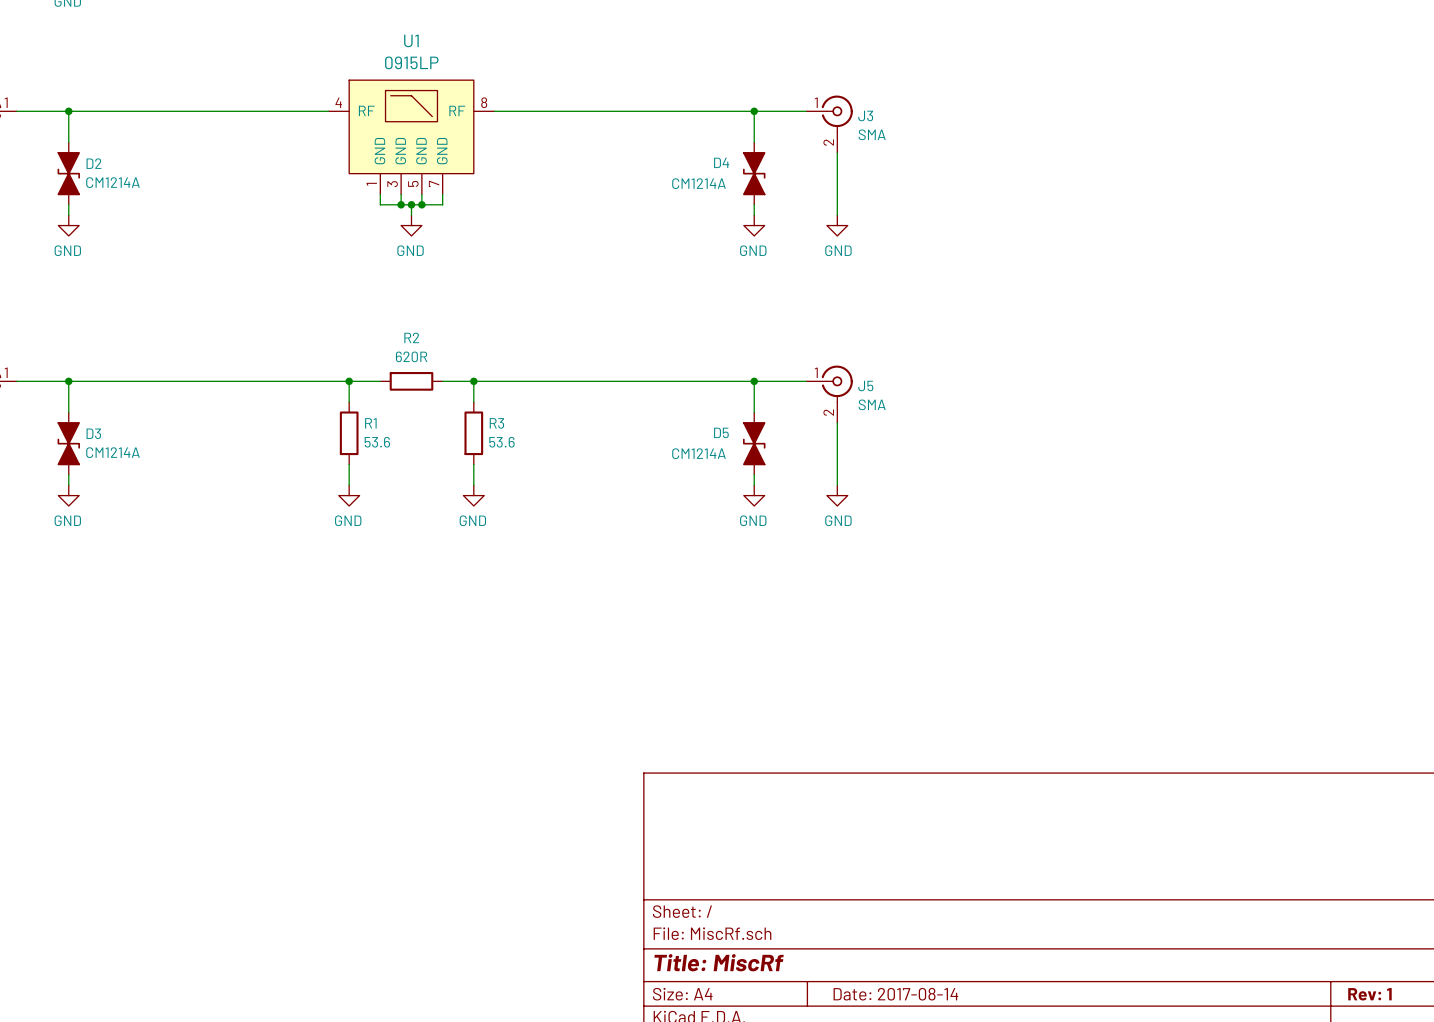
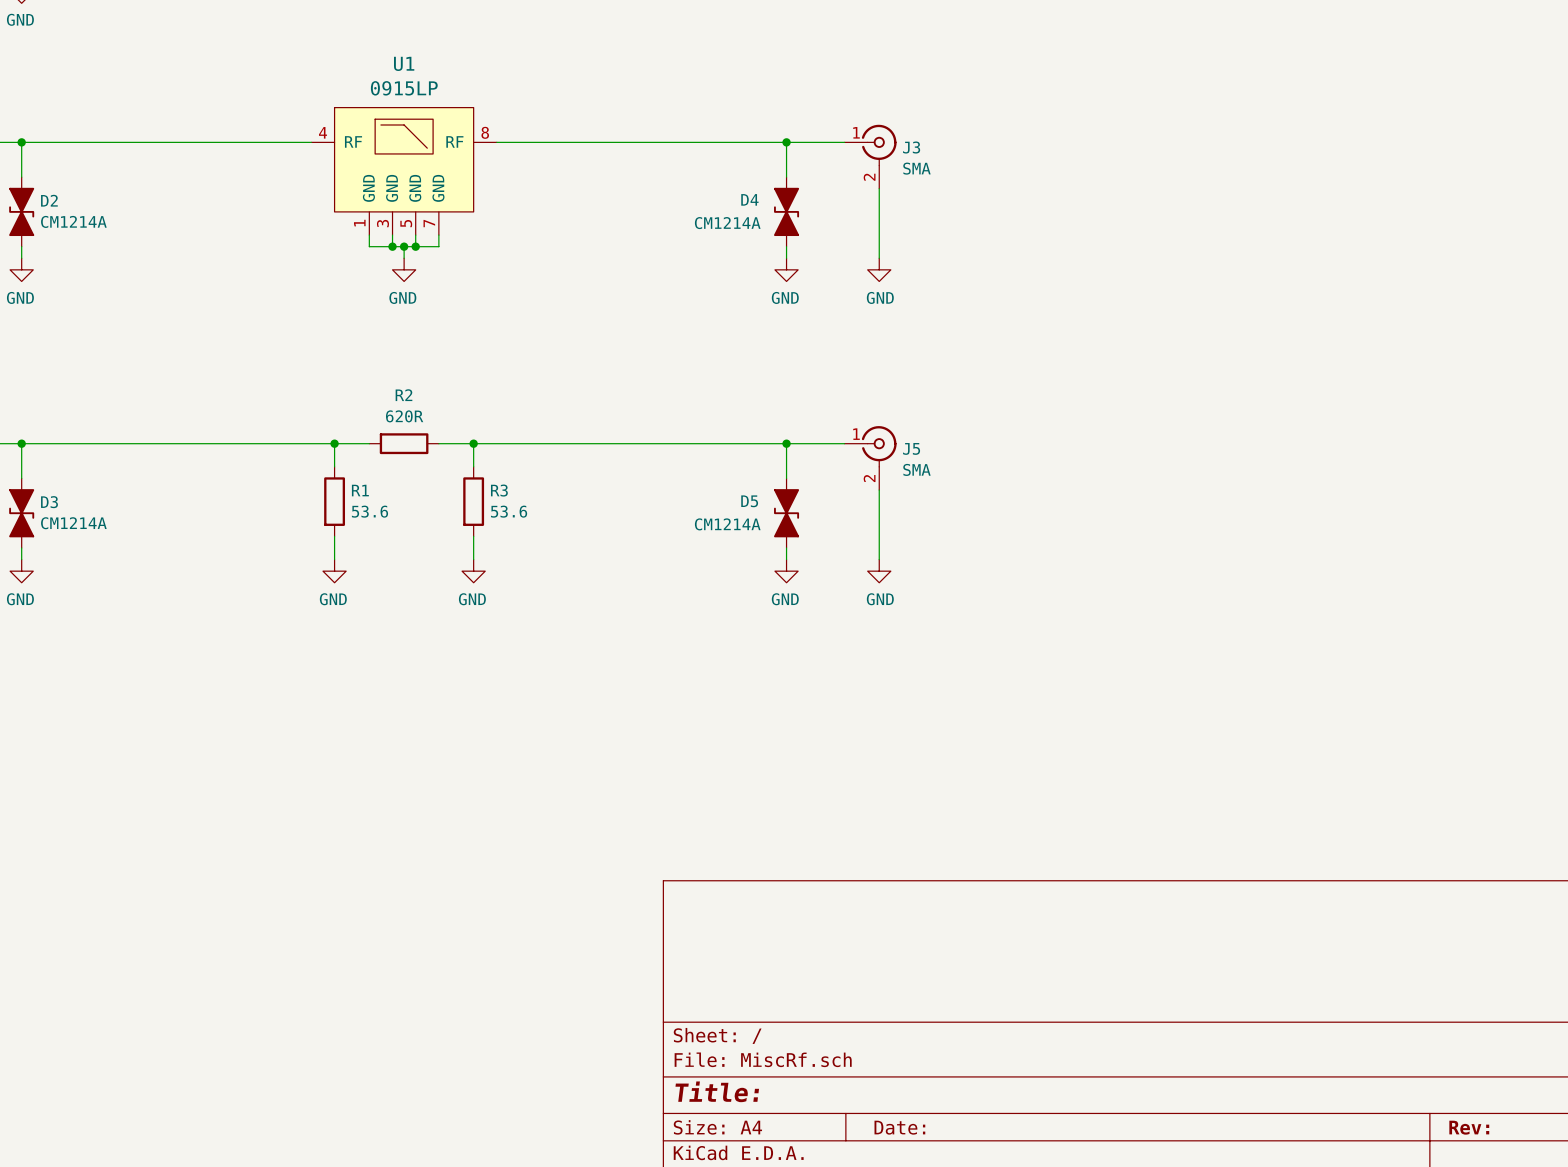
title block: Title: MiscRf (719, 962) -> Title: (717, 1091)
title block: Date: 2017-08-14 (895, 994) -> Date: (899, 1127)
title block: Rev: 1 (1369, 994) -> Rev: (1469, 1127)

